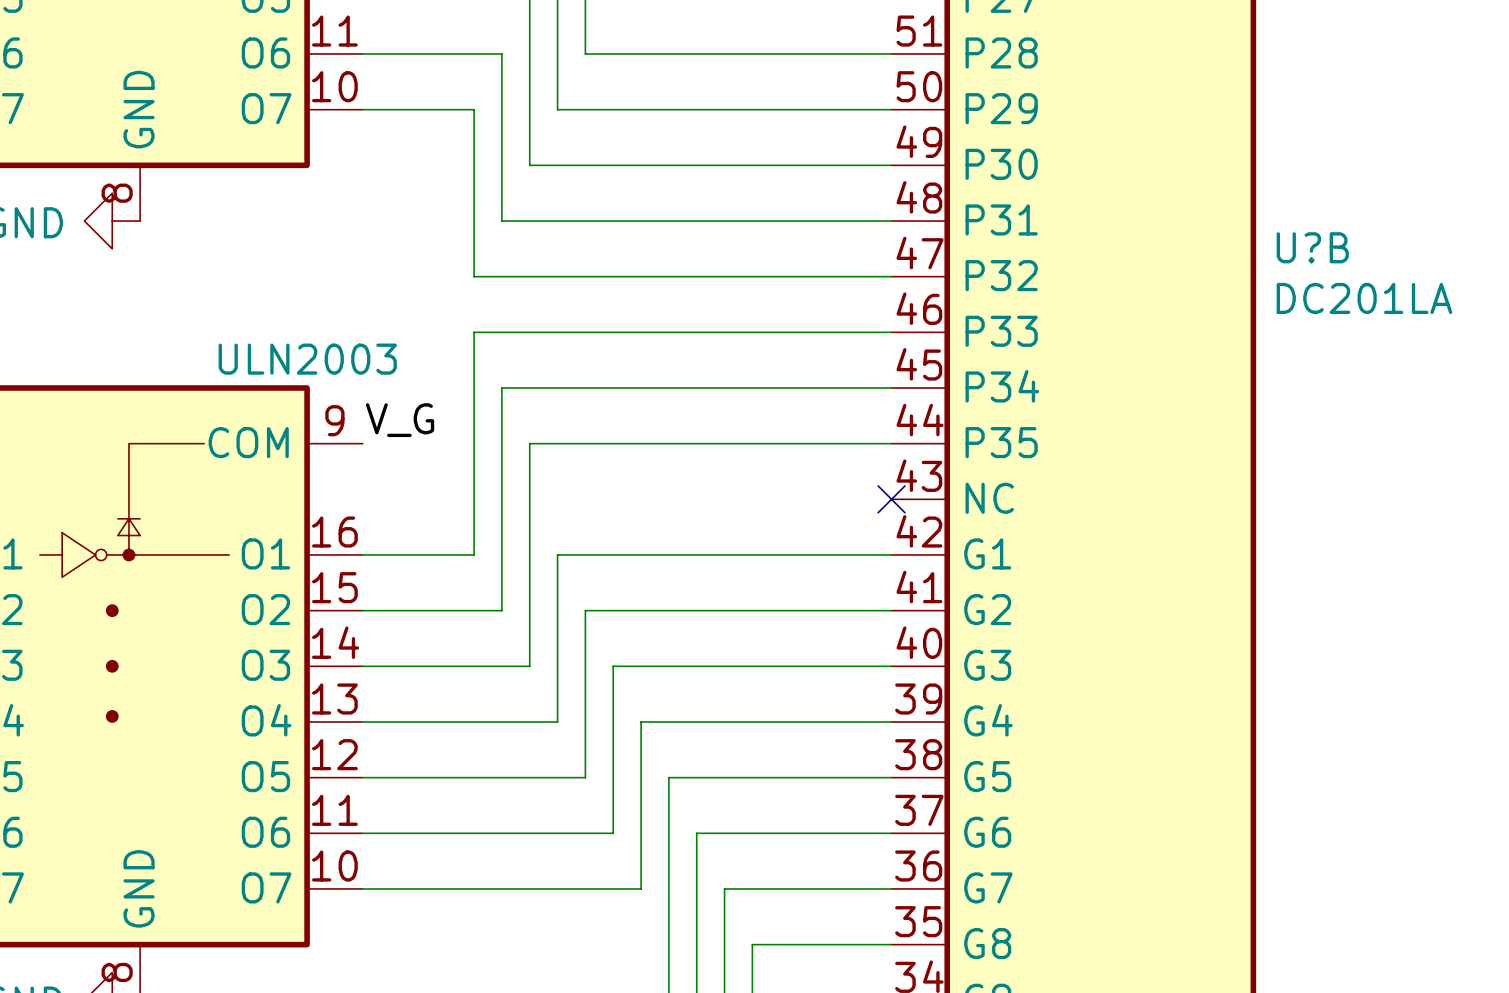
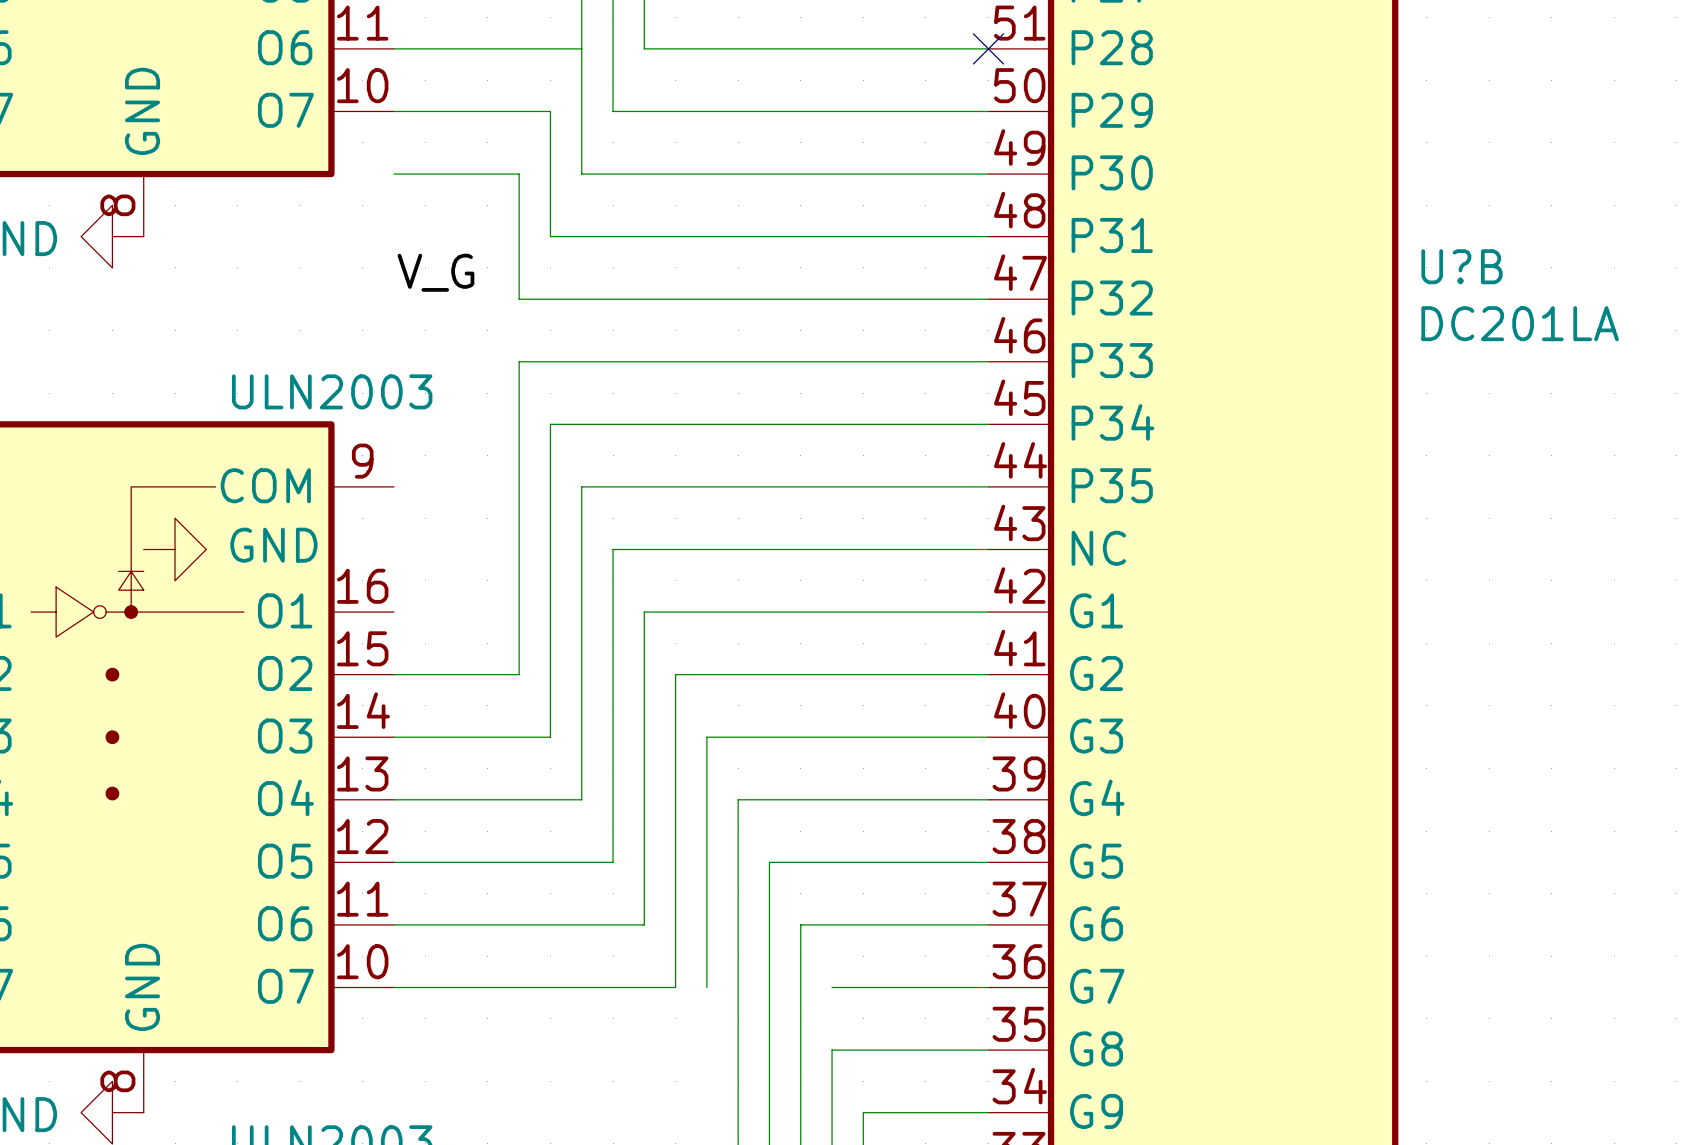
wire: (501, 54) (501, 109) -> (550, 48) (581, 48)
no-connect mark: none -> (988, 48)
wire: (474, 109) (474, 165) -> (519, 111) (550, 111)
label position: V_G (400, 420) -> V_G (435, 272)
power symbol: none -> GND (175, 549)
no-connect mark: (891, 499) -> none
wire: (362, 554) (474, 554) -> (394, 174) (519, 174)
wire: (557, 554) (585, 554) -> (613, 612) (613, 549) (988, 549)
wire: (474, 610) (501, 610) -> (519, 674) (519, 612)
wire: none -> (550, 674) (550, 737)
wire: (585, 610) (613, 610) -> (644, 674) (644, 612)
wire: none -> (675, 674) (675, 737)
wire: (501, 666) (529, 666) -> (581, 799) (581, 737)
wire: (613, 666) (641, 666) -> (706, 799) (706, 737)
wire: (529, 721) (557, 721) -> (613, 862) (613, 799)
wire: (641, 721) (668, 721) -> (738, 862) (738, 799)
wire: (557, 777) (585, 777) -> none
wire: (668, 777) (696, 777) -> (769, 924) (769, 862)
wire: (585, 833) (613, 833) -> (644, 924) (644, 862)
wire: (696, 833) (724, 833) -> (800, 987) (800, 924)
wire: (613, 888) (641, 888) -> (675, 987) (675, 924)
wire: (724, 888) (752, 888) -> none

